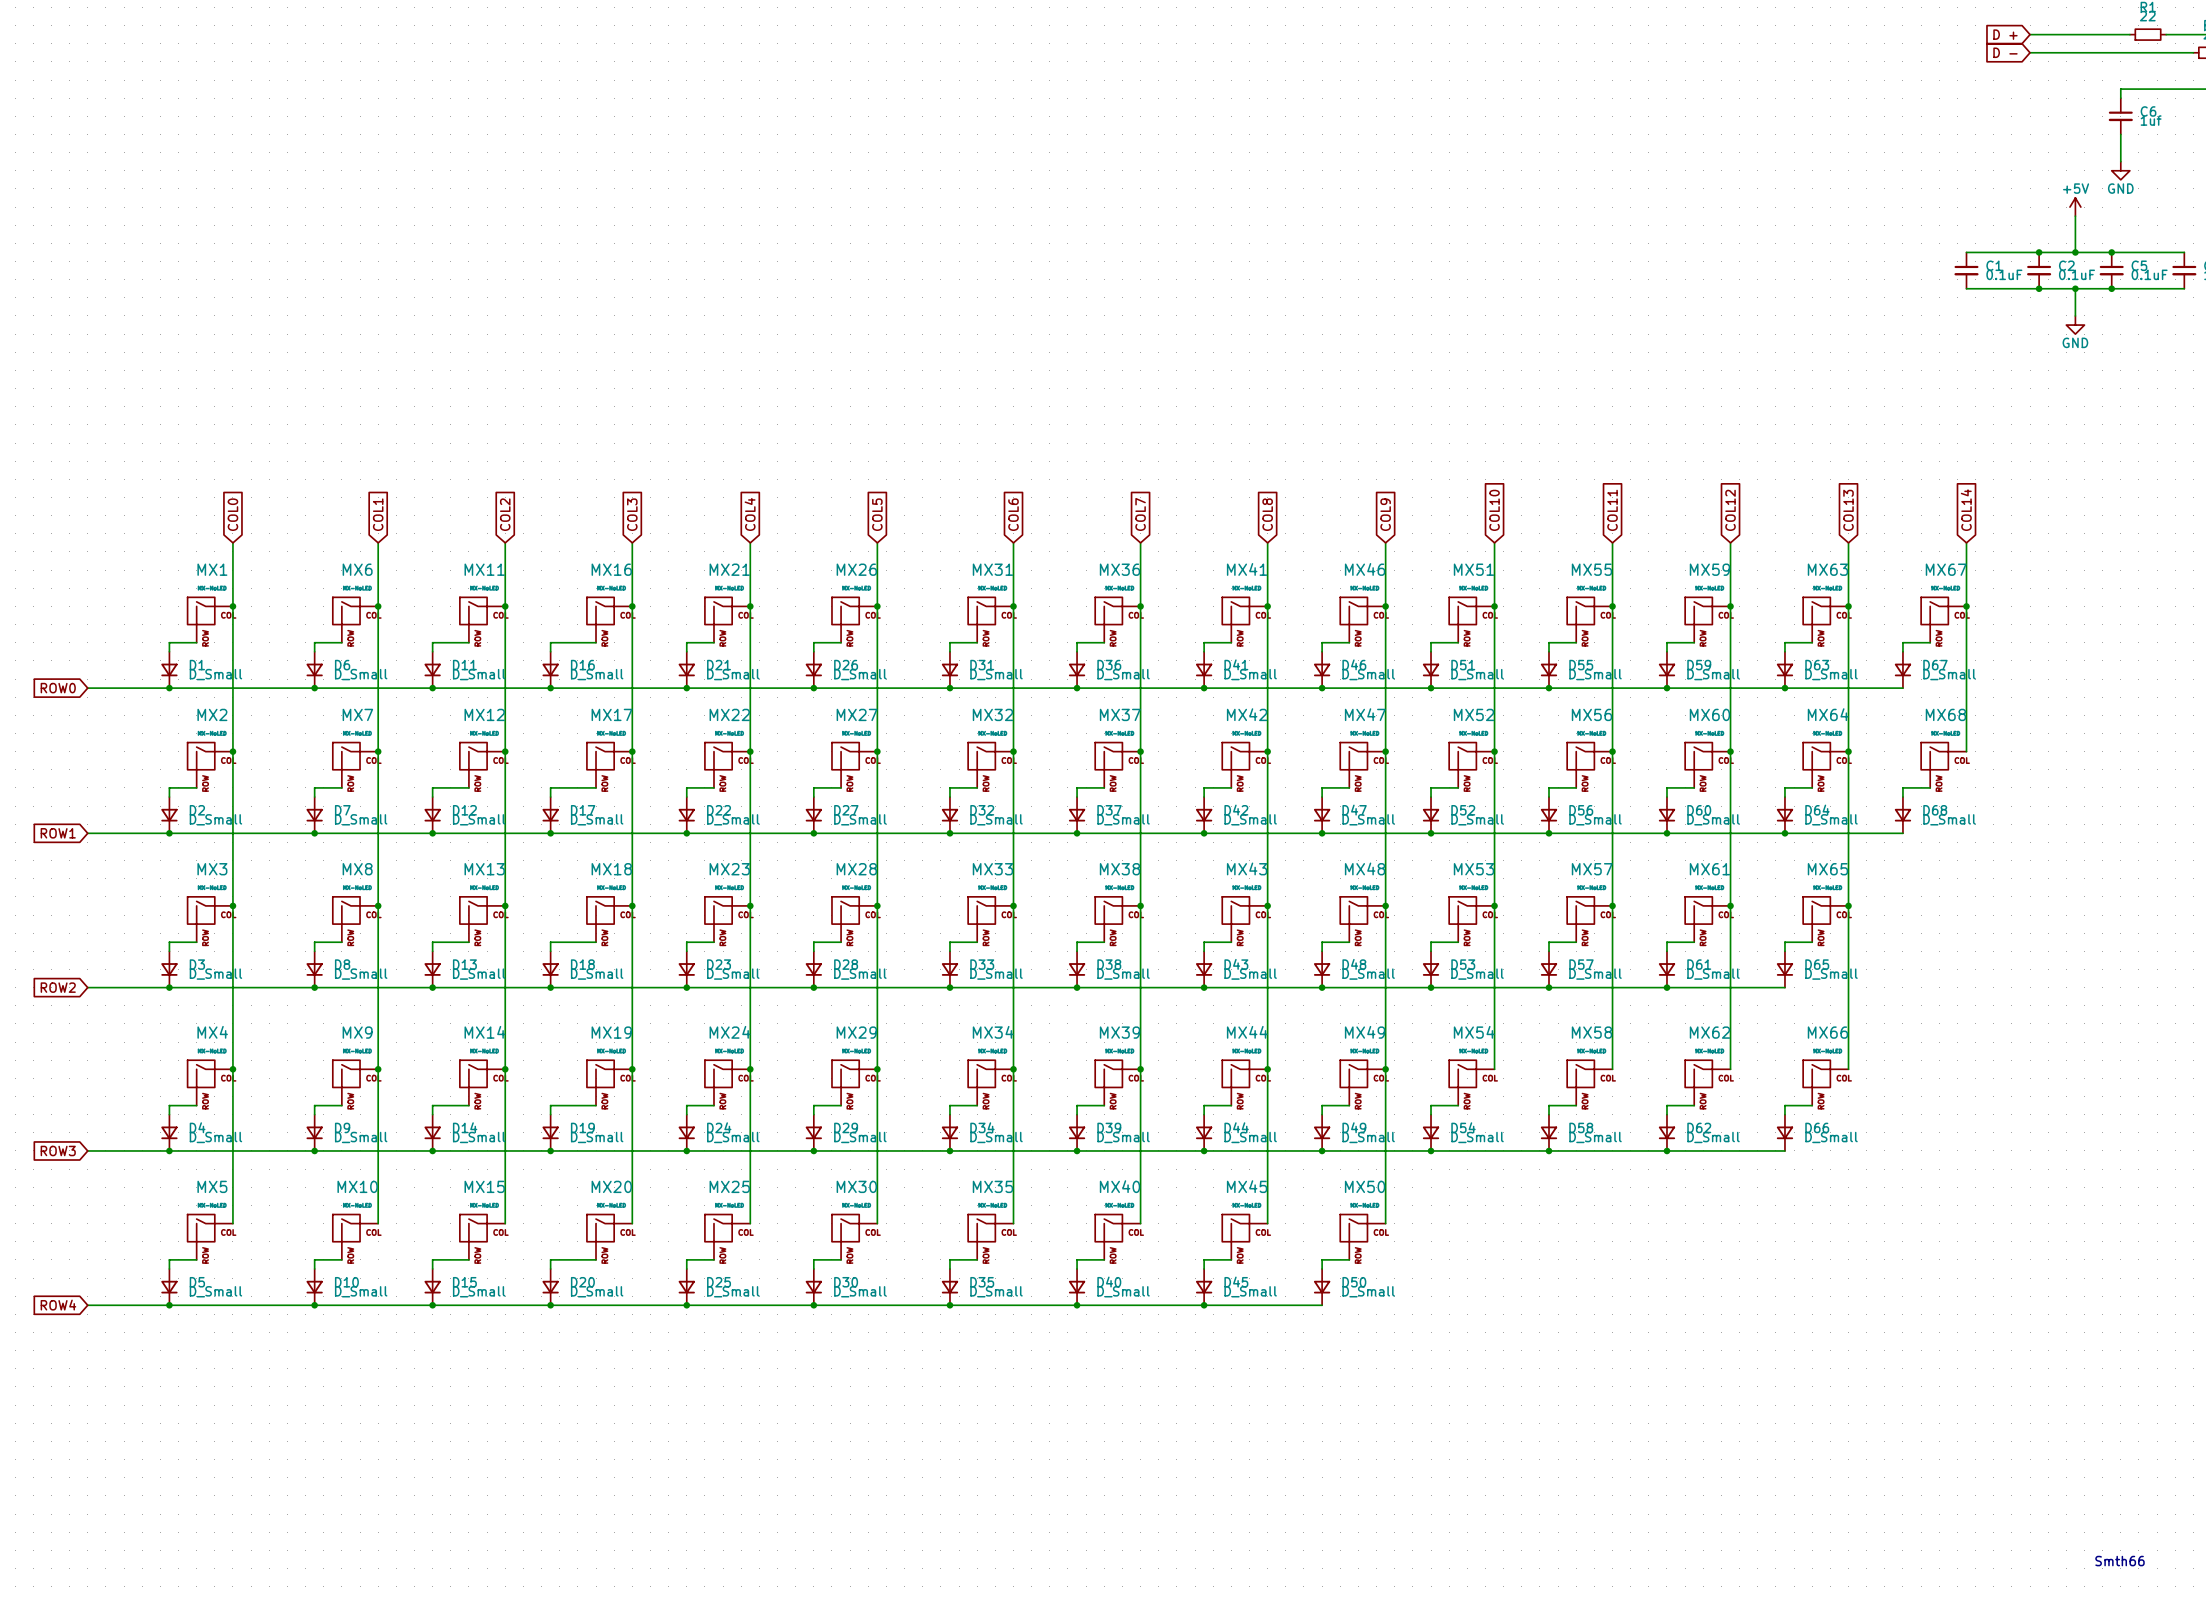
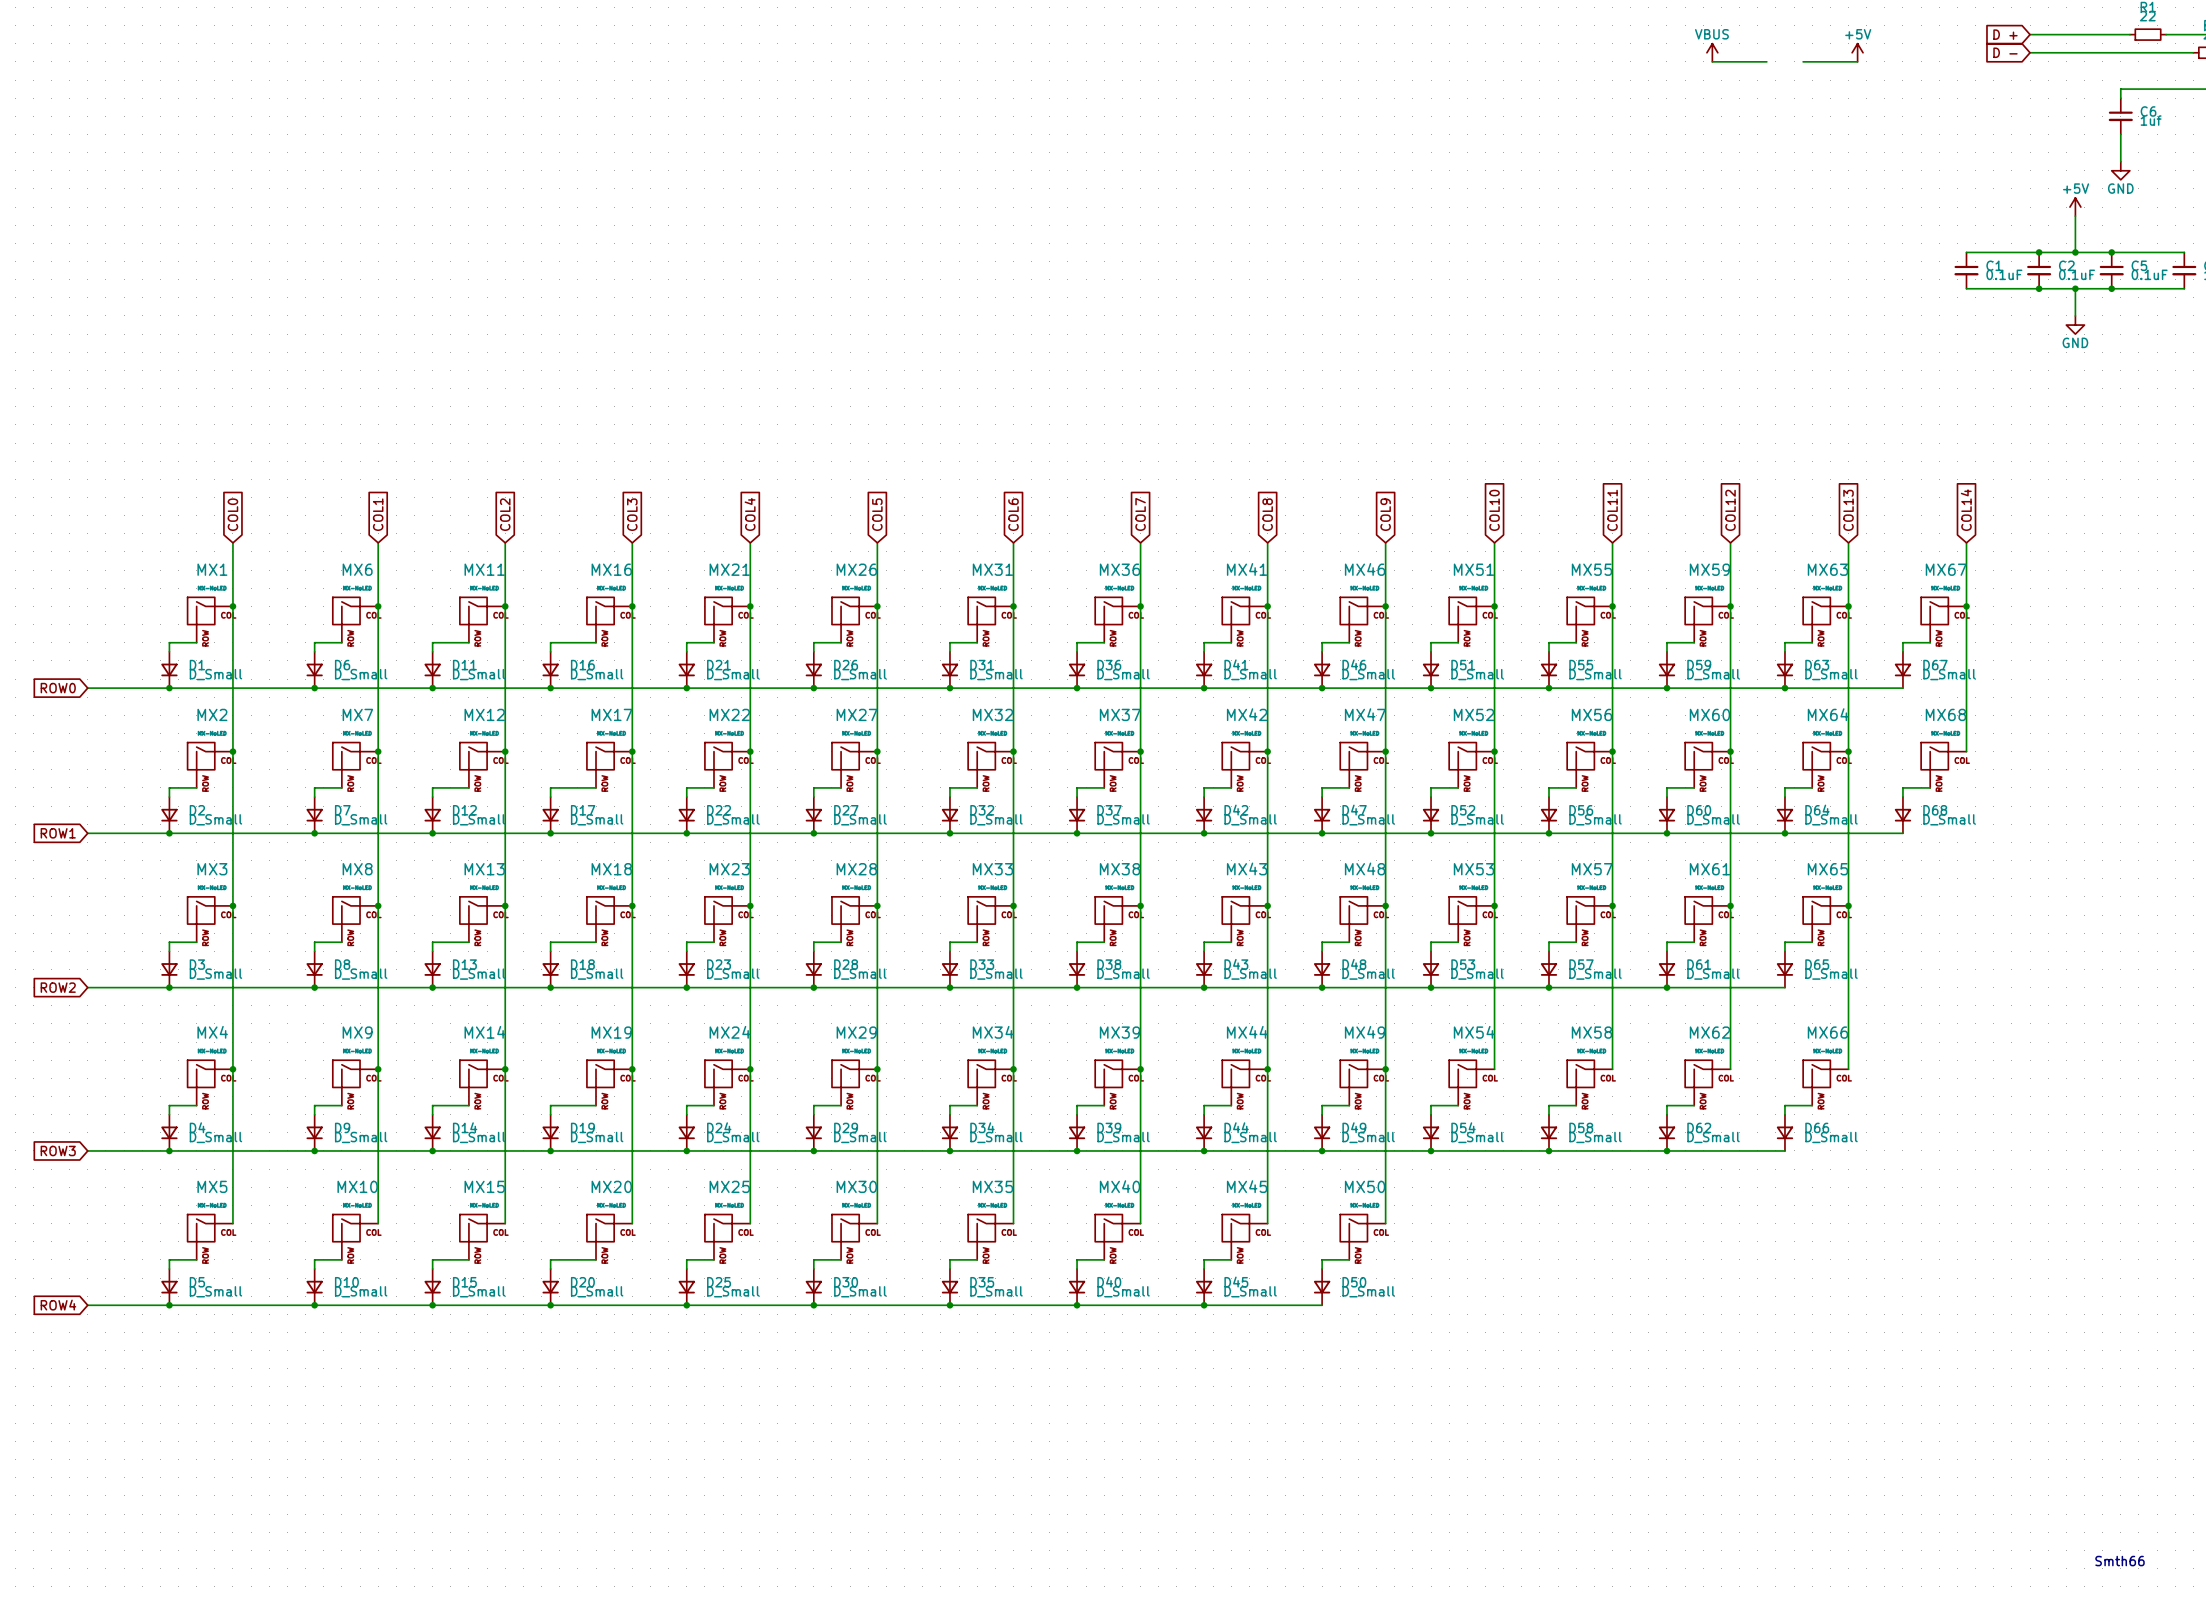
power symbol: none -> VBUS (1712, 52)
power symbol: none -> +5V (1857, 52)
wire: none -> (1712, 61) (1766, 61)
wire: none -> (1803, 61) (1857, 61)

